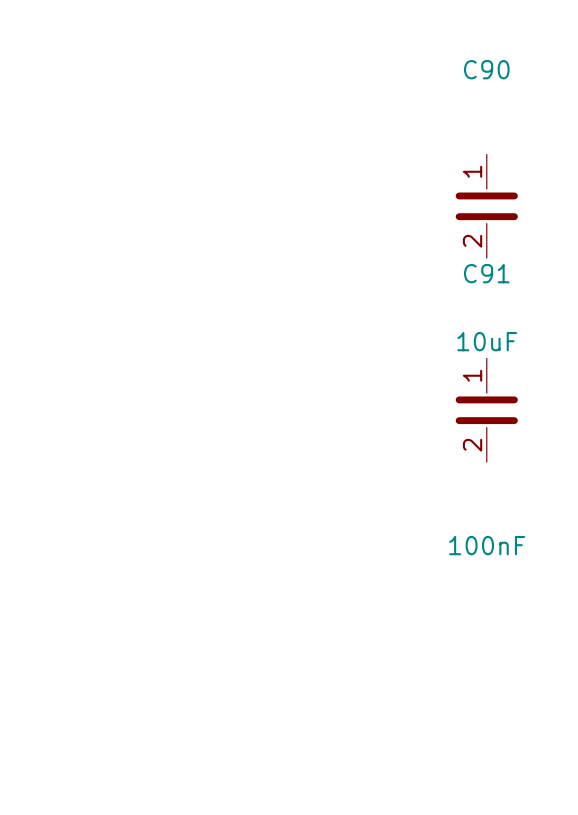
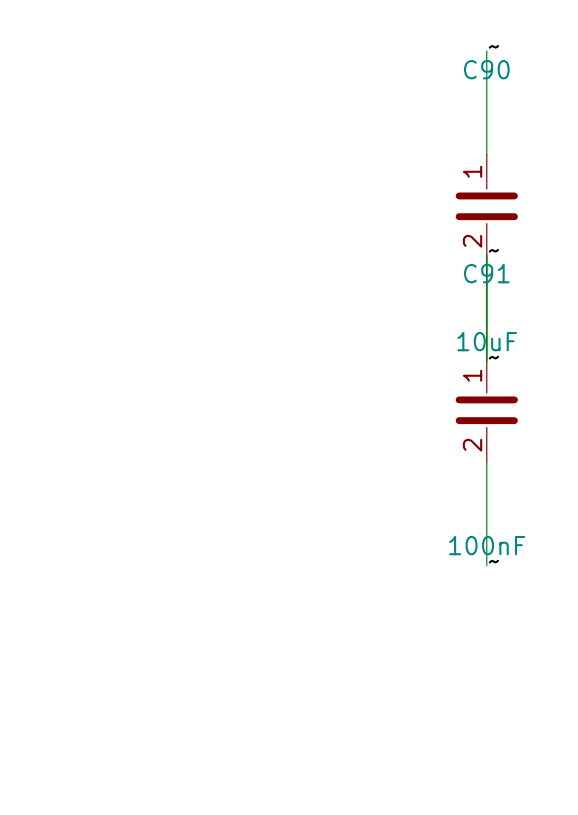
label: none -> ~ (493, 46)
wire: none -> (486, 50) (486, 154)
label: none -> ~ (493, 250)
wire: none -> (486, 254) (486, 361)
label: none -> ~ (493, 357)
wire: none -> (486, 462) (486, 565)
label: none -> ~ (493, 561)

